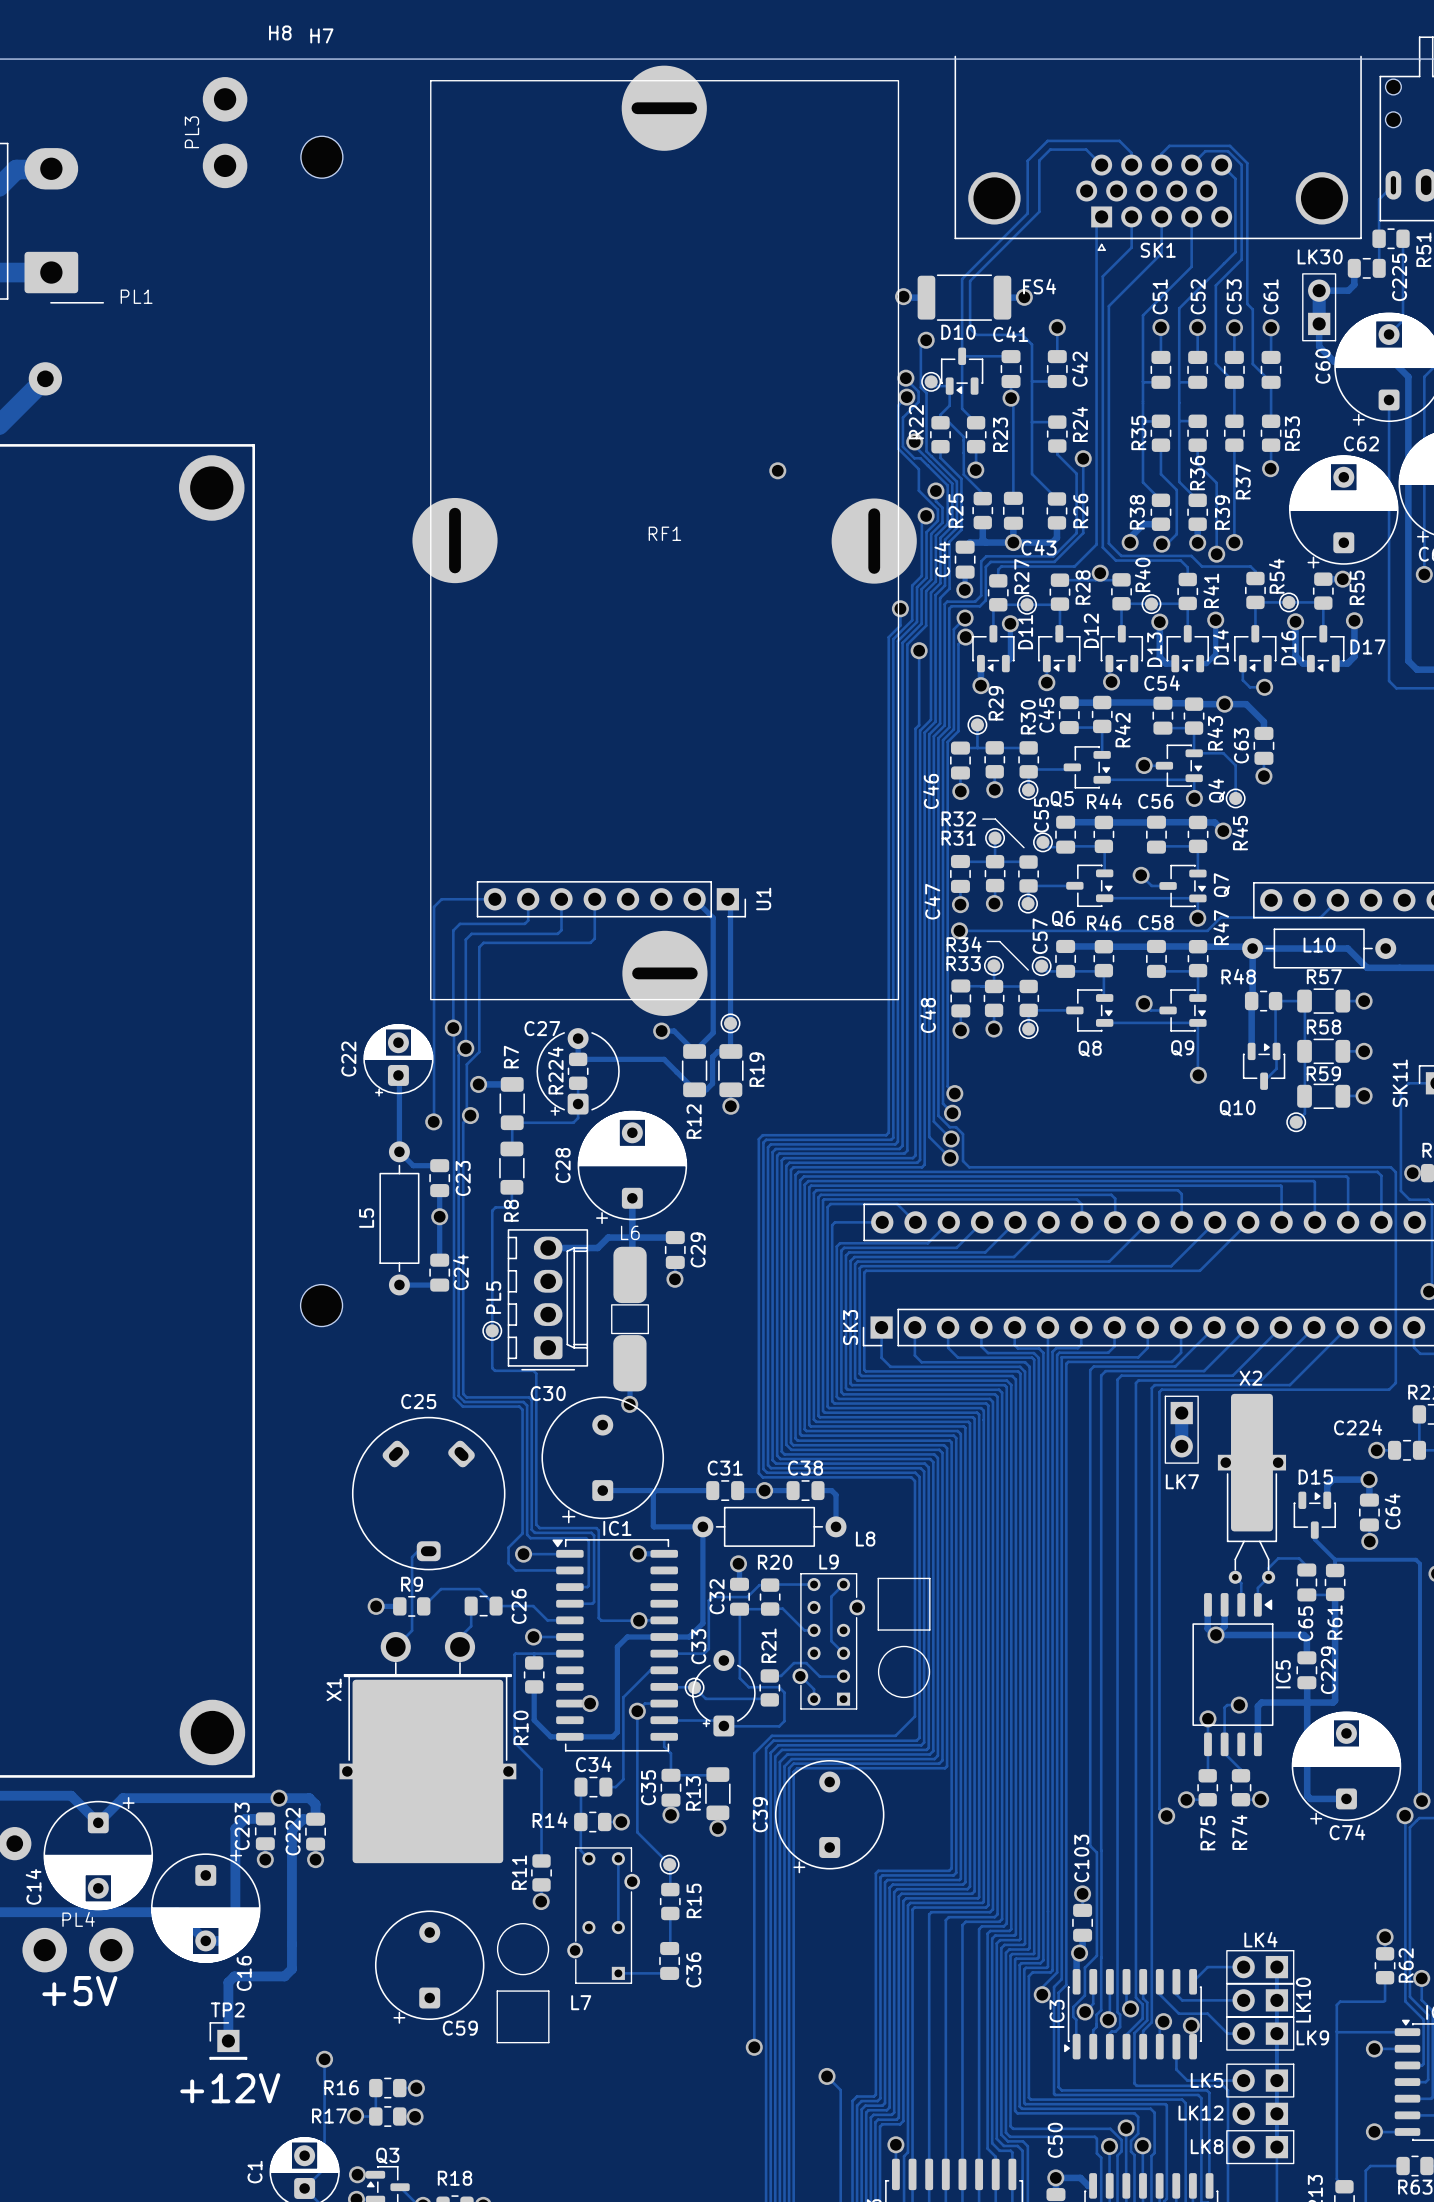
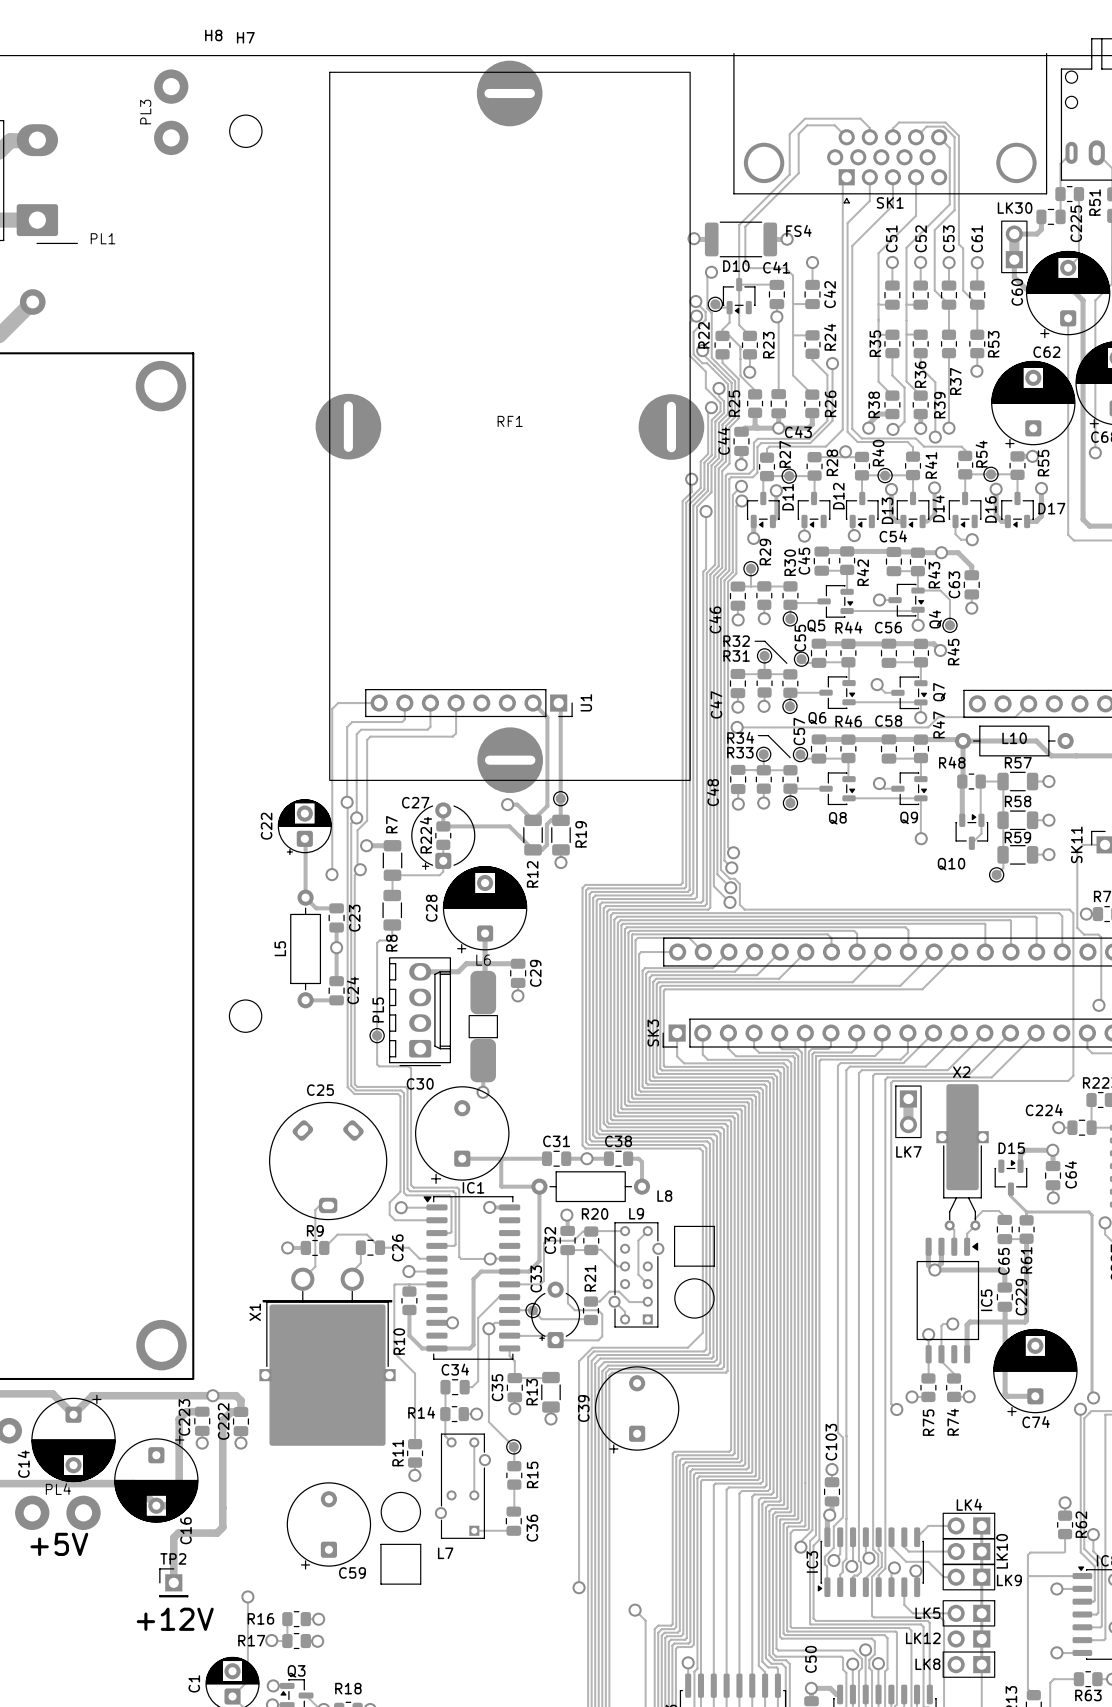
via: (777, 470) -> none

